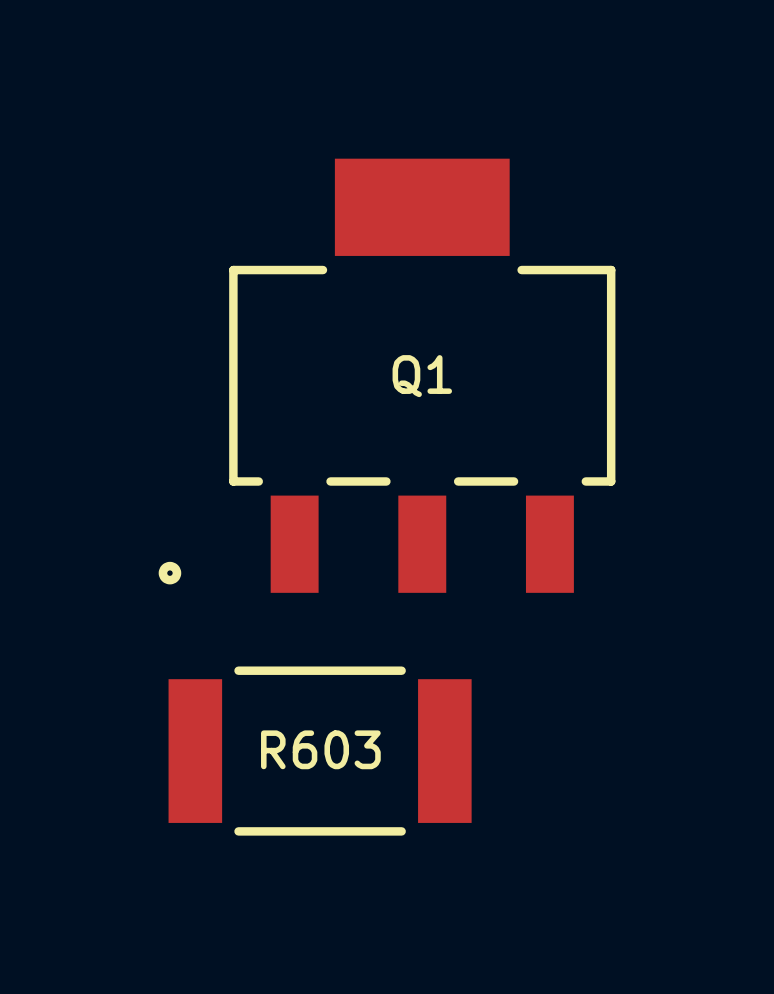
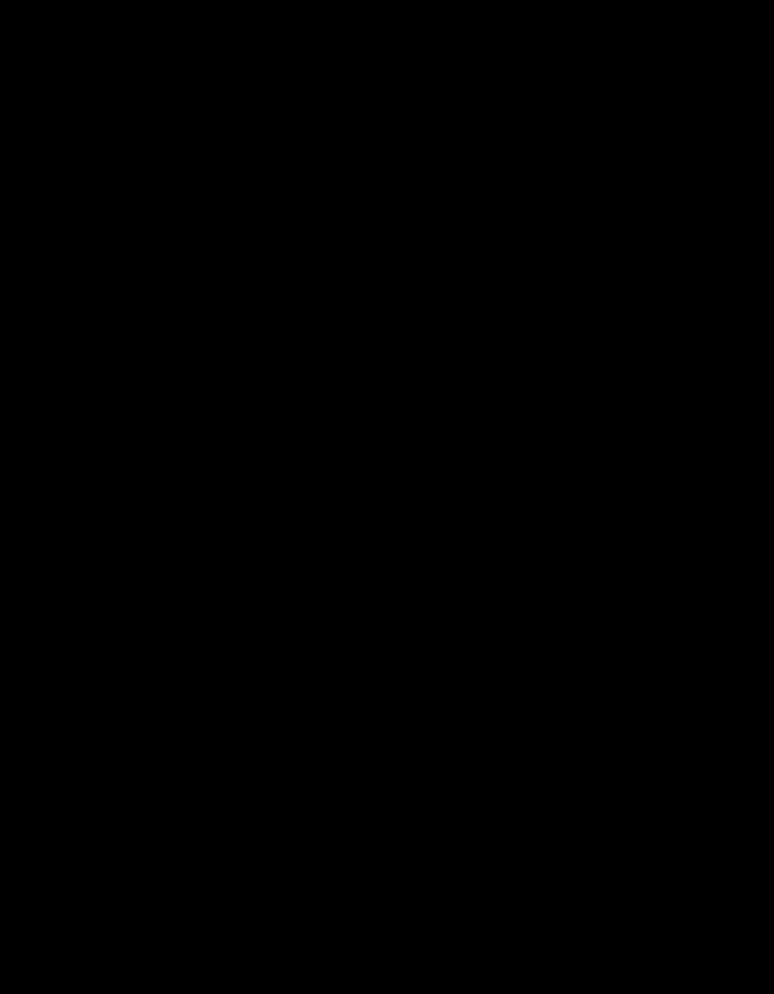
Q1: (387, 375) -> none
R603: (320, 751) -> none

